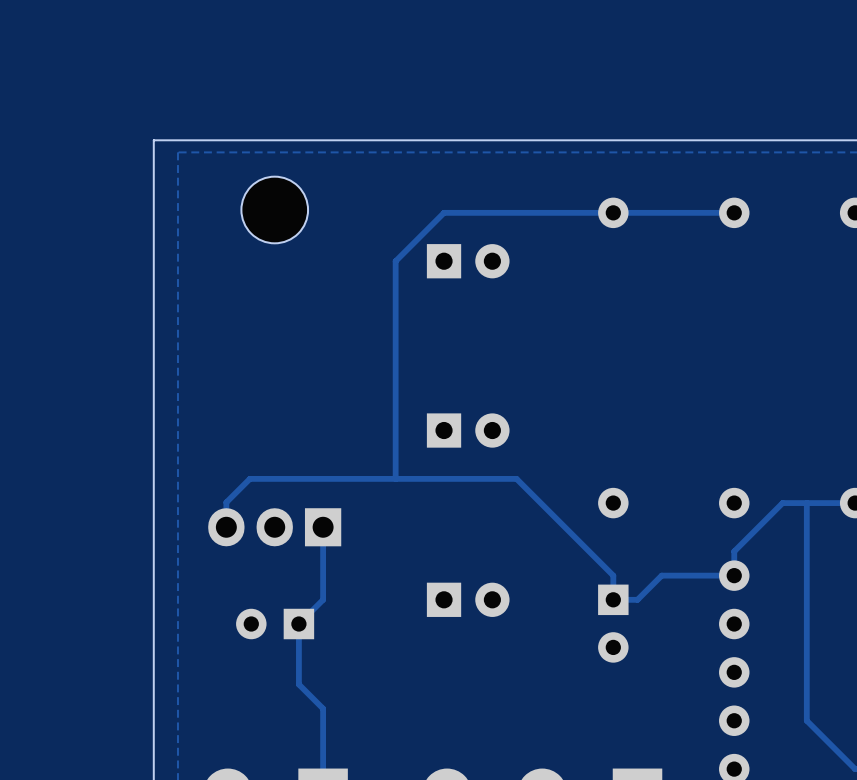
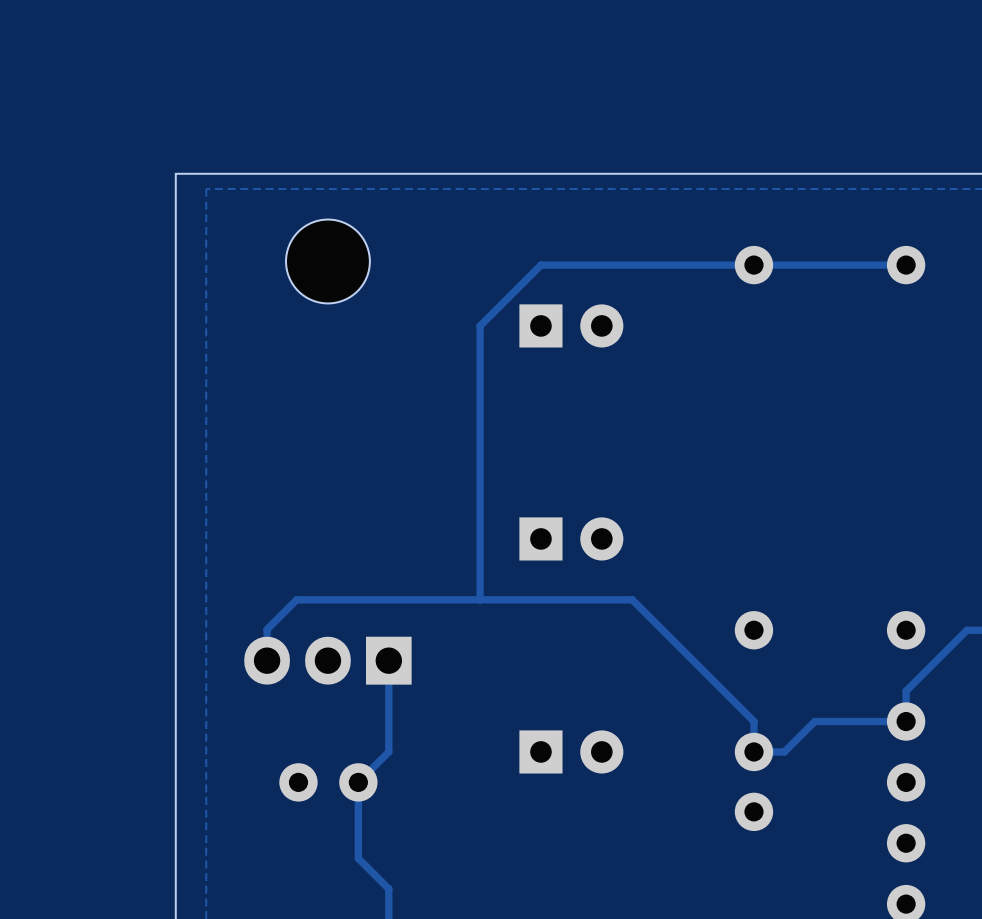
part footprint: [598, 584, 629, 663] -> [734, 732, 774, 832]
part footprint: [236, 608, 315, 640] -> [279, 763, 378, 802]

